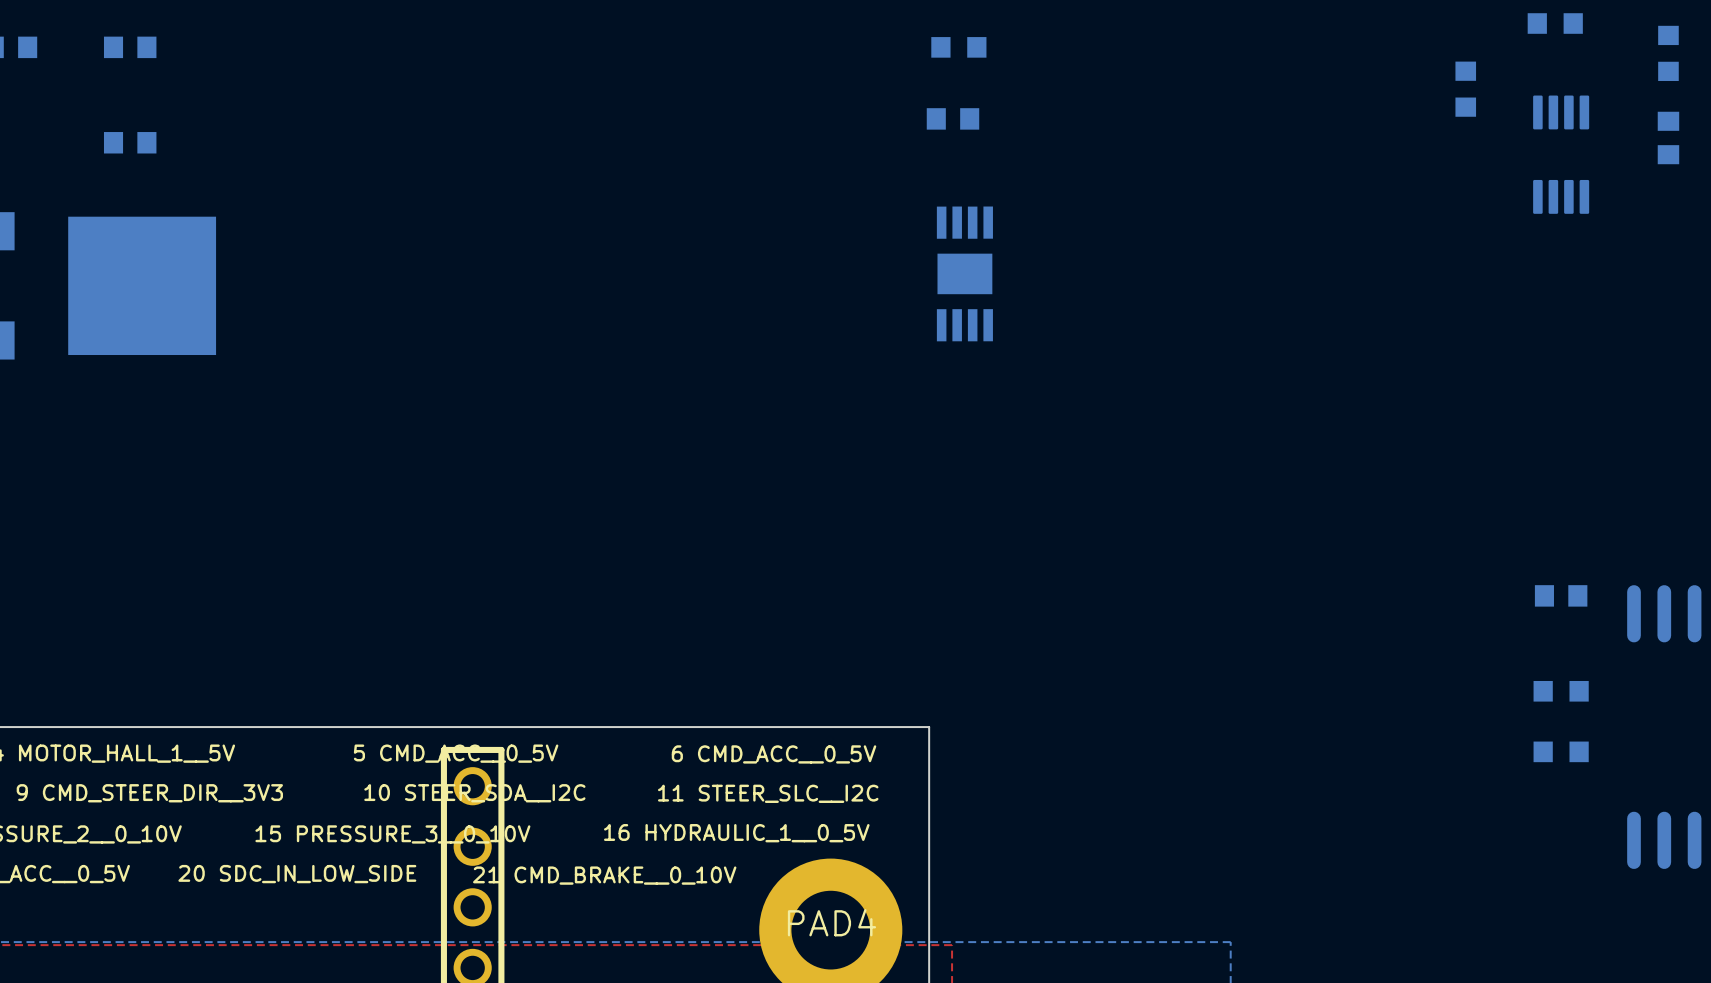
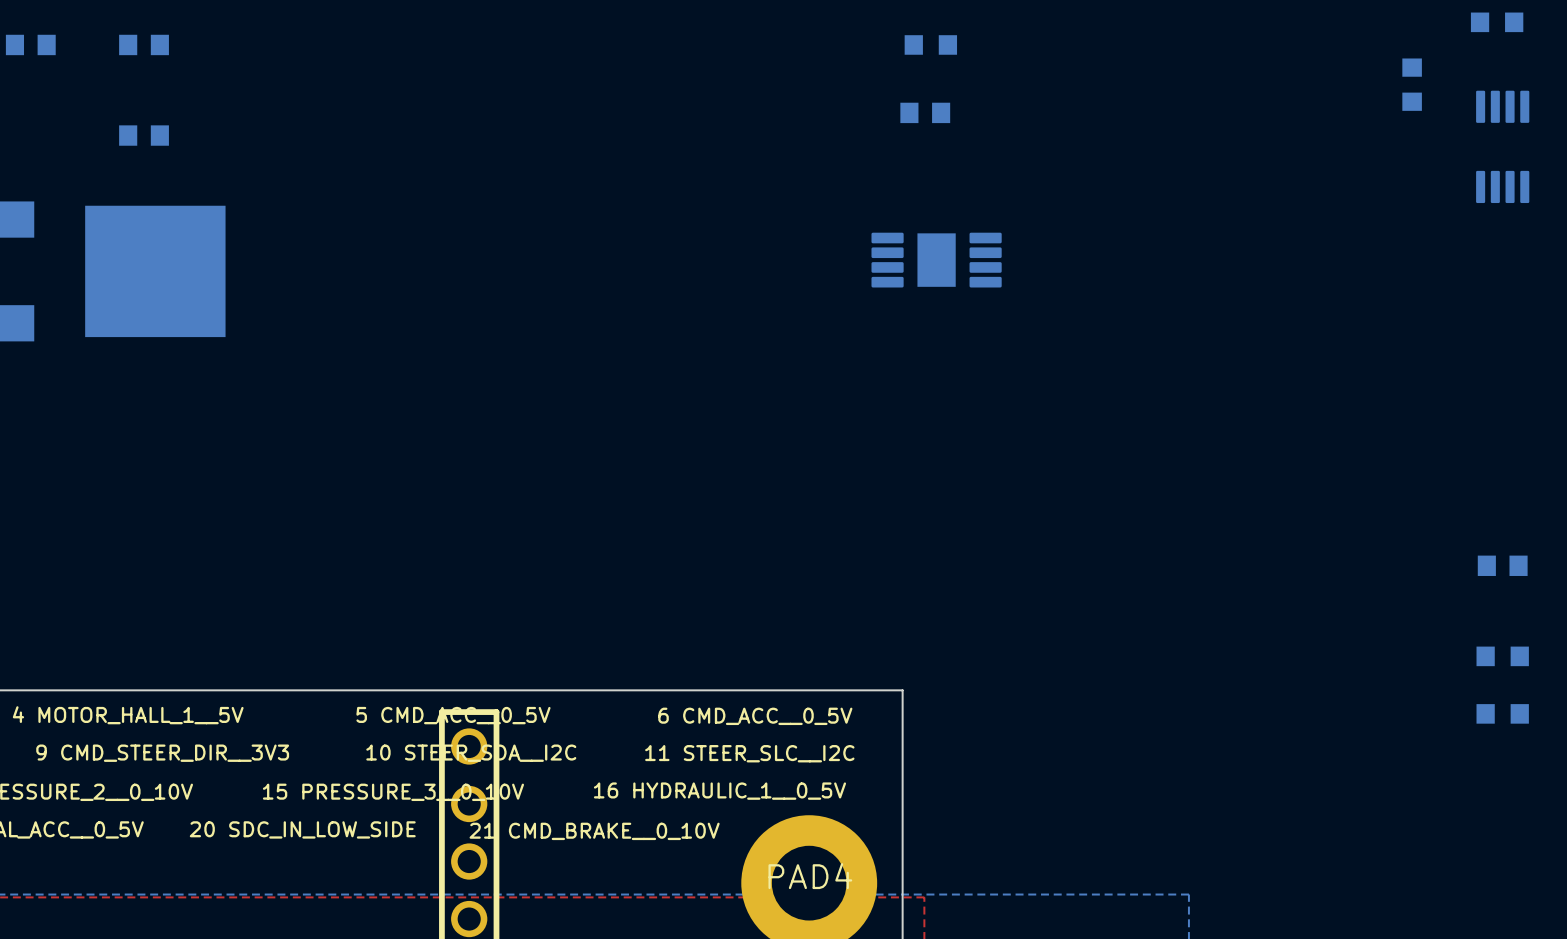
part footprint: [936, 206, 993, 342] -> [871, 232, 1002, 288]

